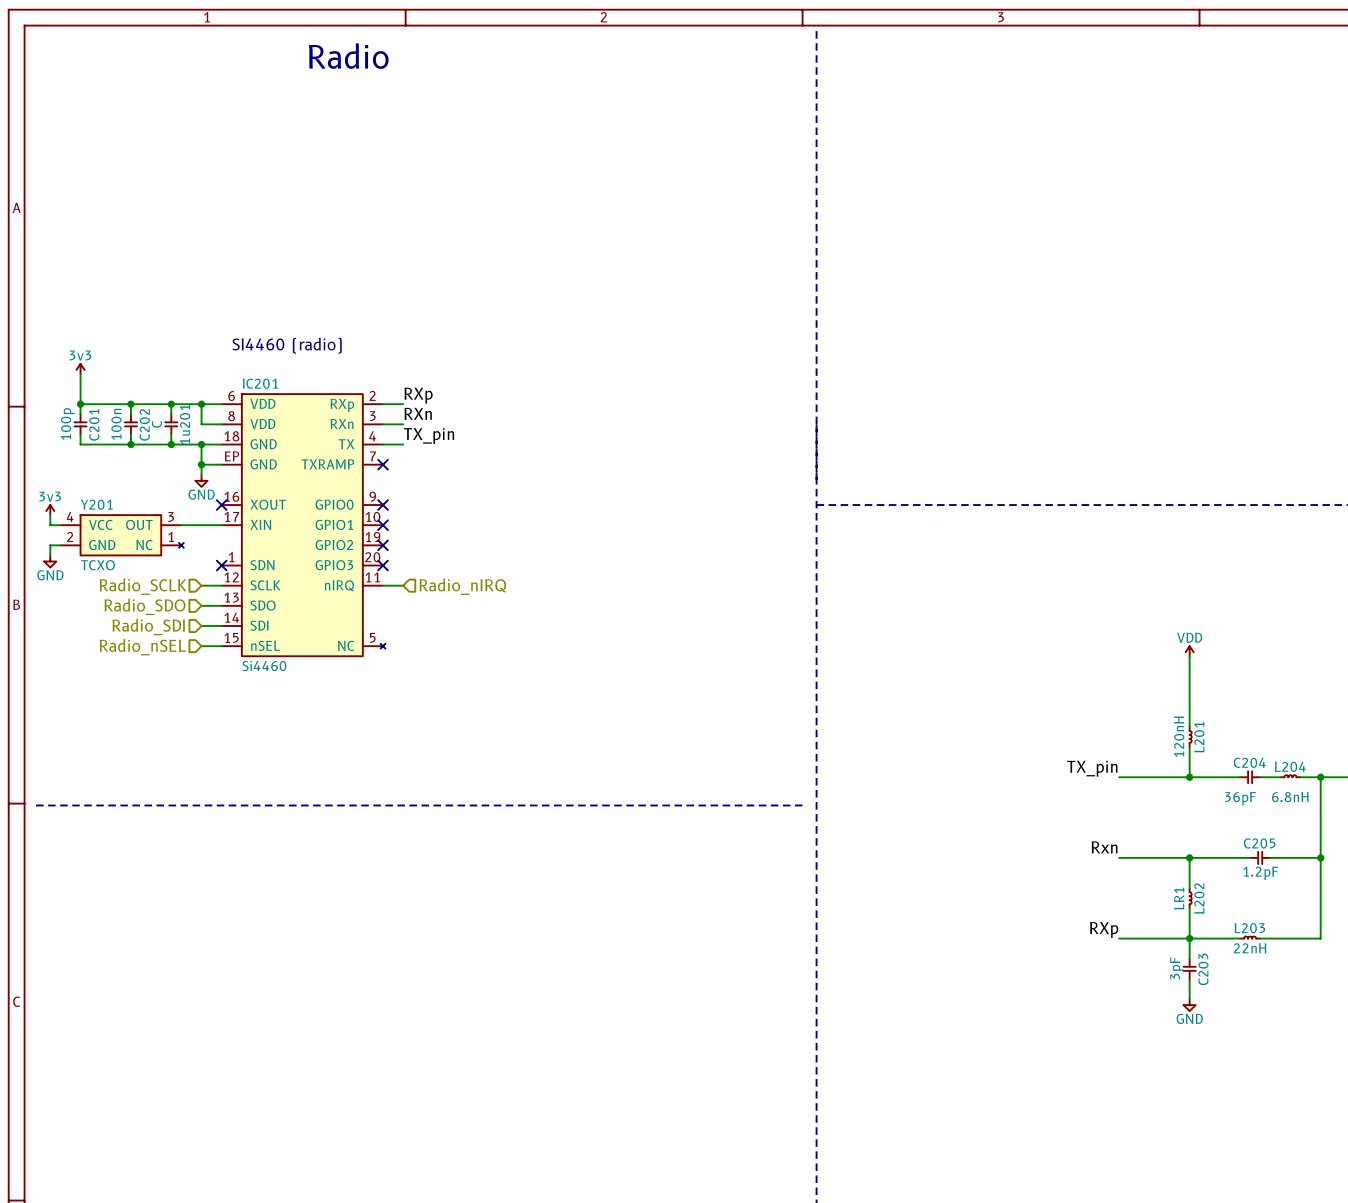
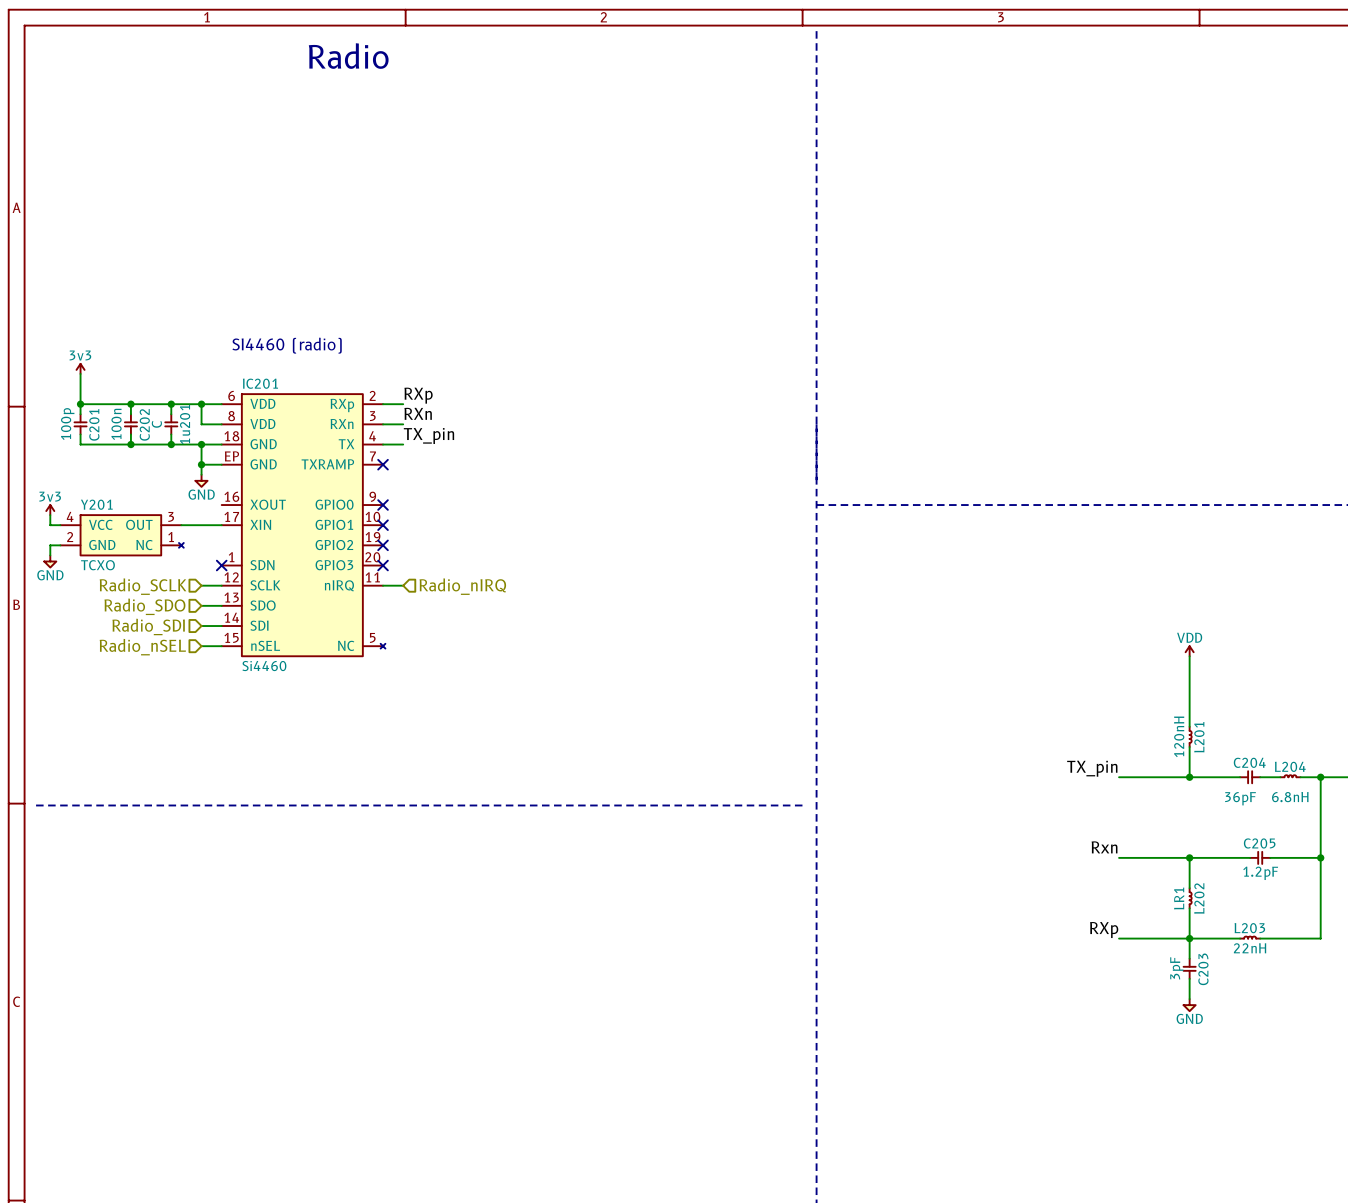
no-connect mark: (221, 505) -> none

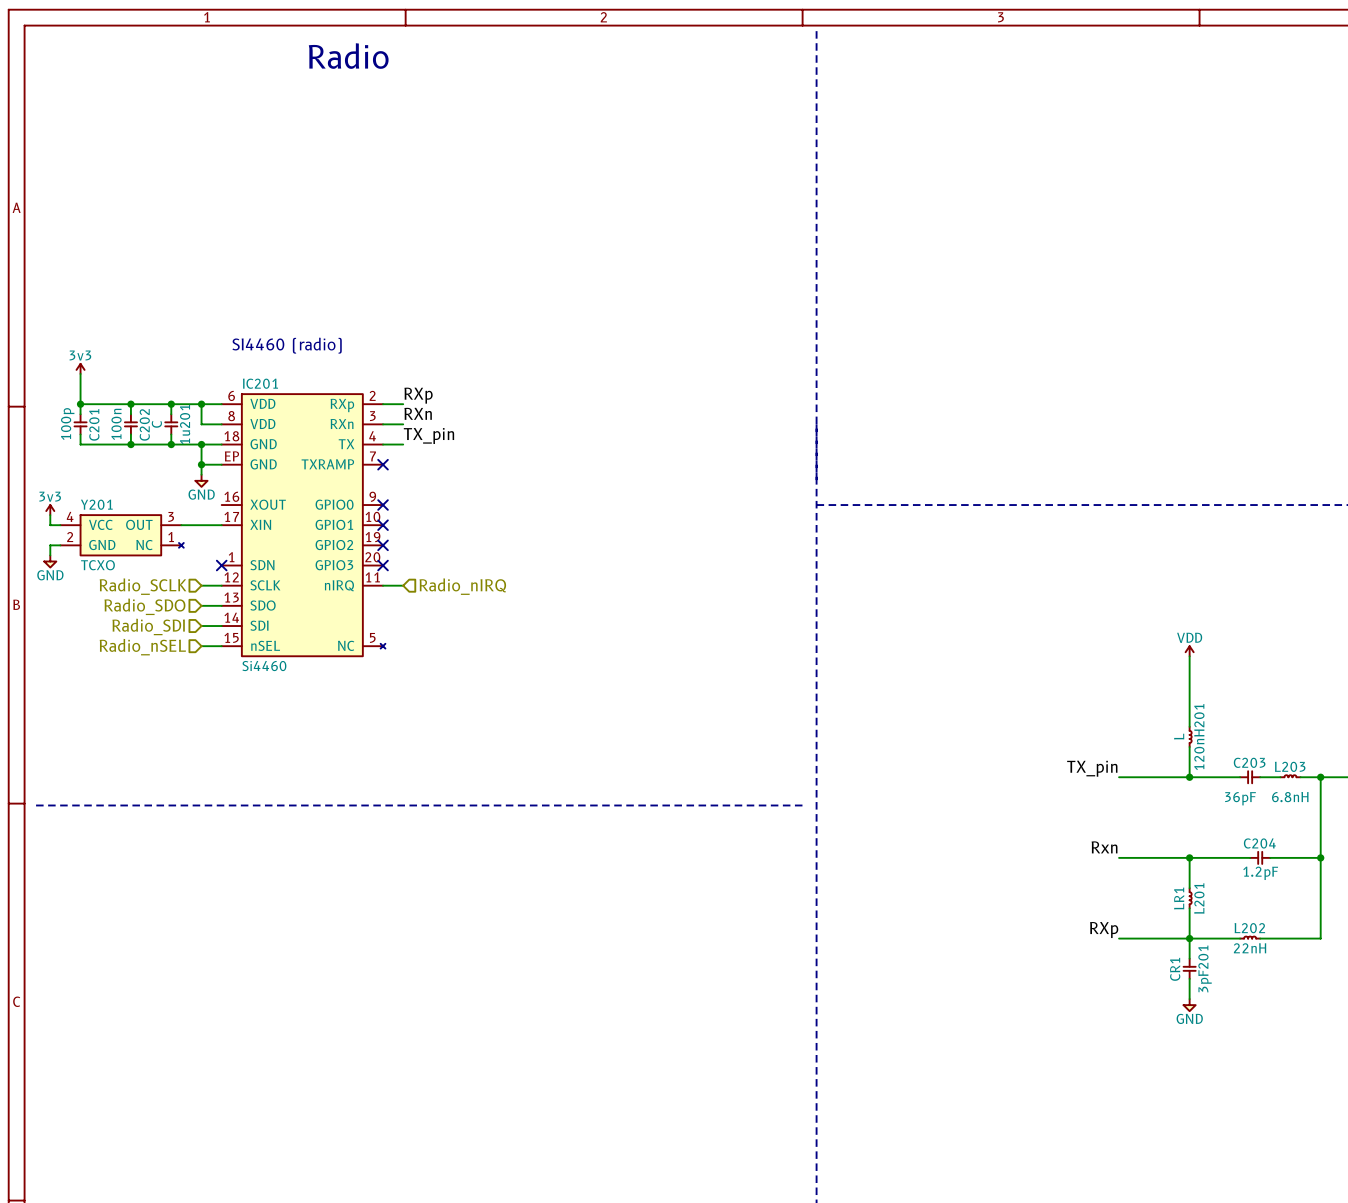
L201 value: 120nH (1179, 736) -> L (1179, 736)
L201 name: L201 (1199, 737) -> 120nH201 (1199, 737)
C204 name: C204 (1249, 762) -> C203 (1249, 762)
L204 name: L204 (1290, 766) -> L203 (1290, 766)
C205 name: C205 (1259, 843) -> C204 (1259, 843)
L202 name: L202 (1199, 898) -> L201 (1199, 898)
L203 name: L203 (1249, 928) -> L202 (1249, 928)
C203 value: 3pF (1176, 968) -> CR1 (1175, 969)
C203 name: C203 (1203, 969) -> 3pF201 (1205, 968)

